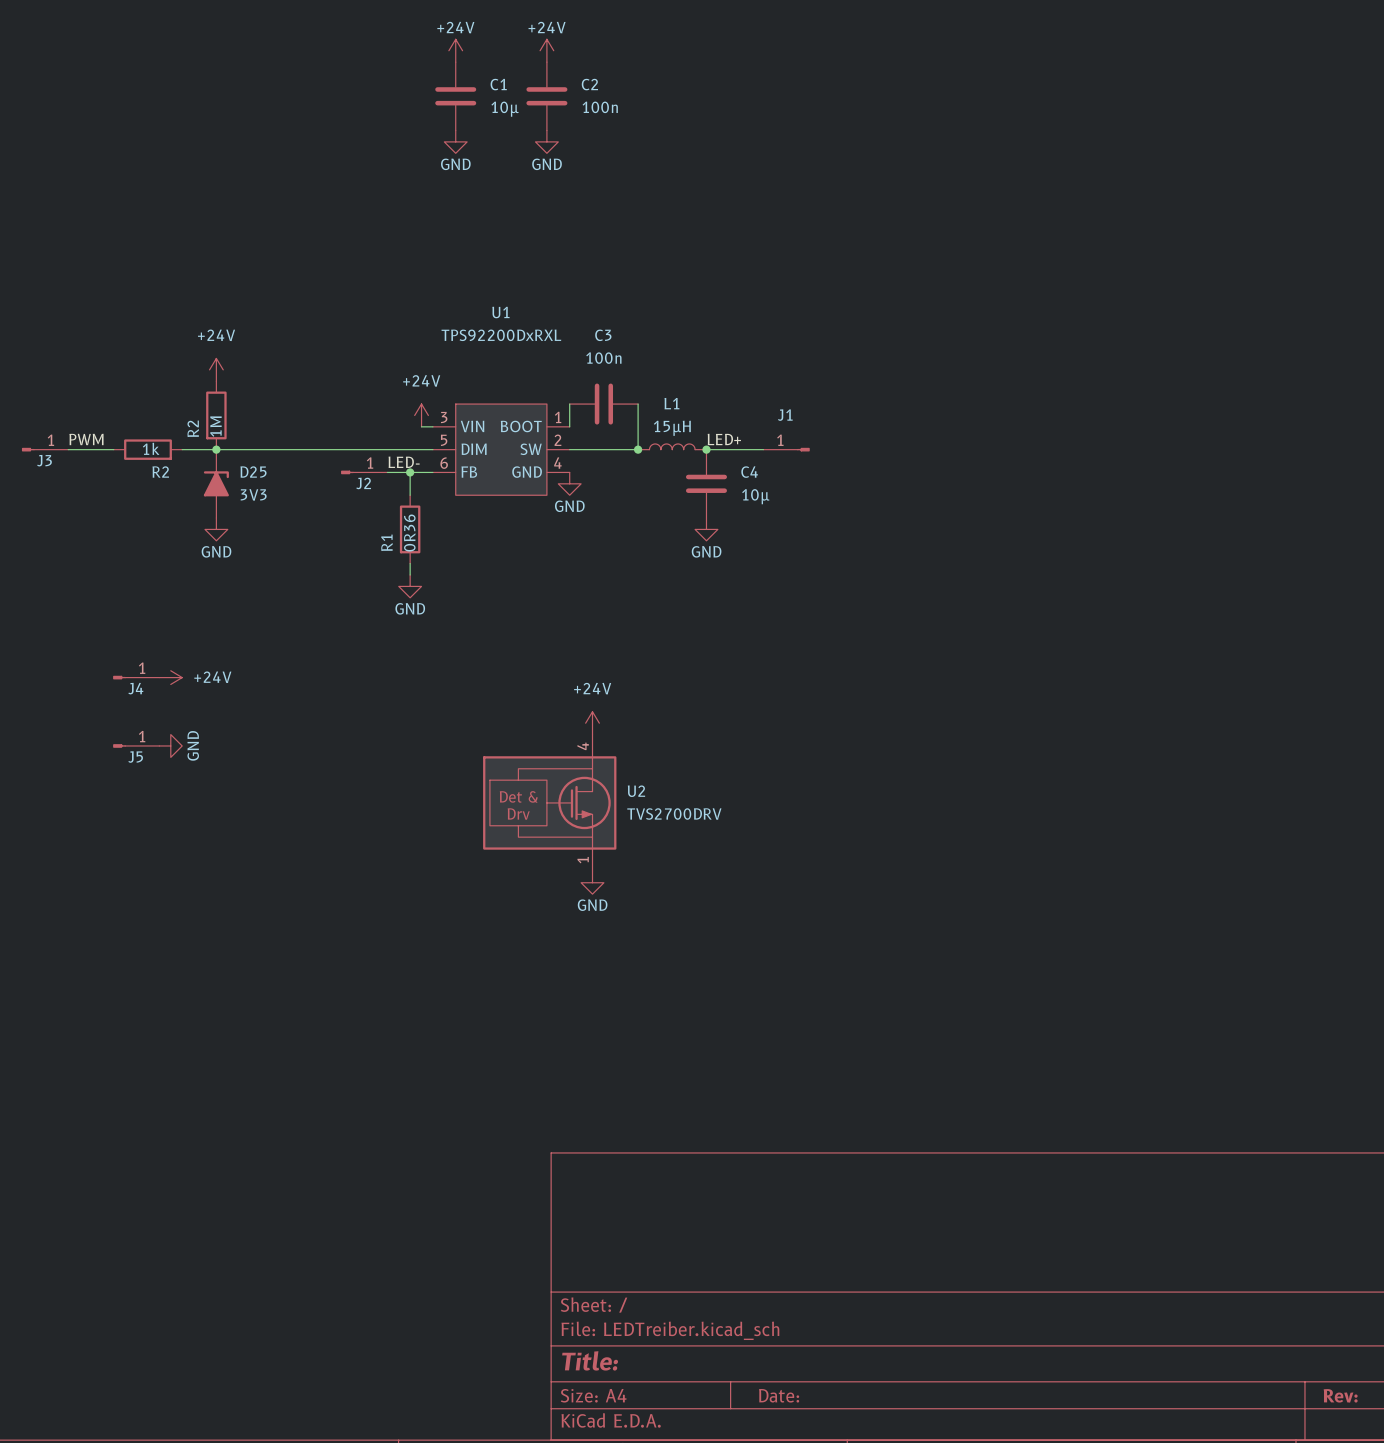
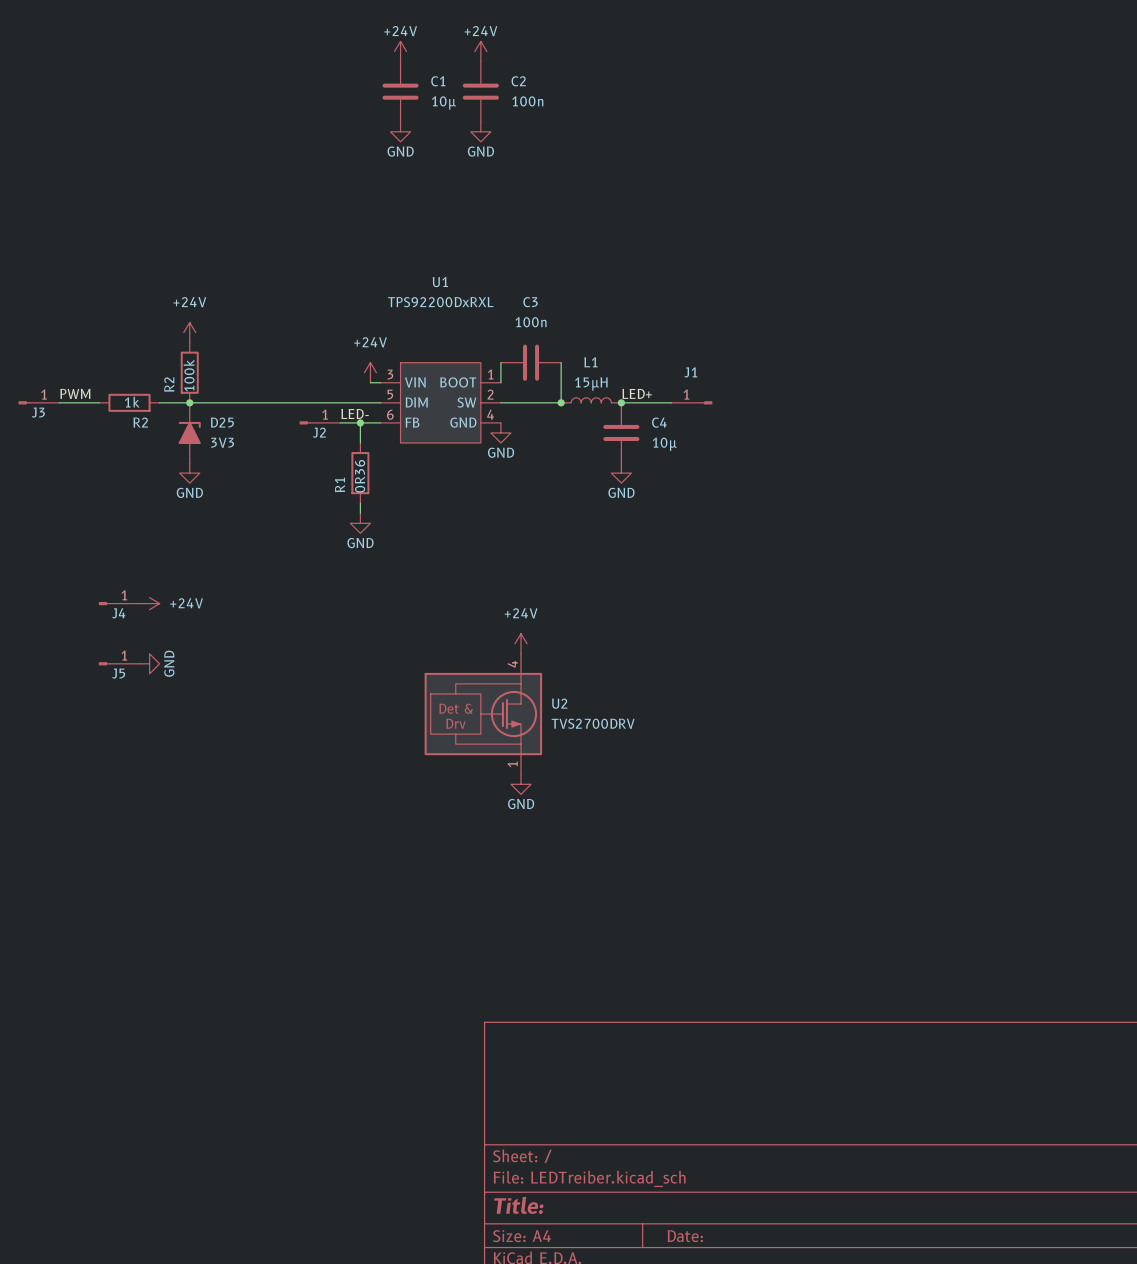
R2 value: 1M (215, 426) -> 100k (189, 375)

